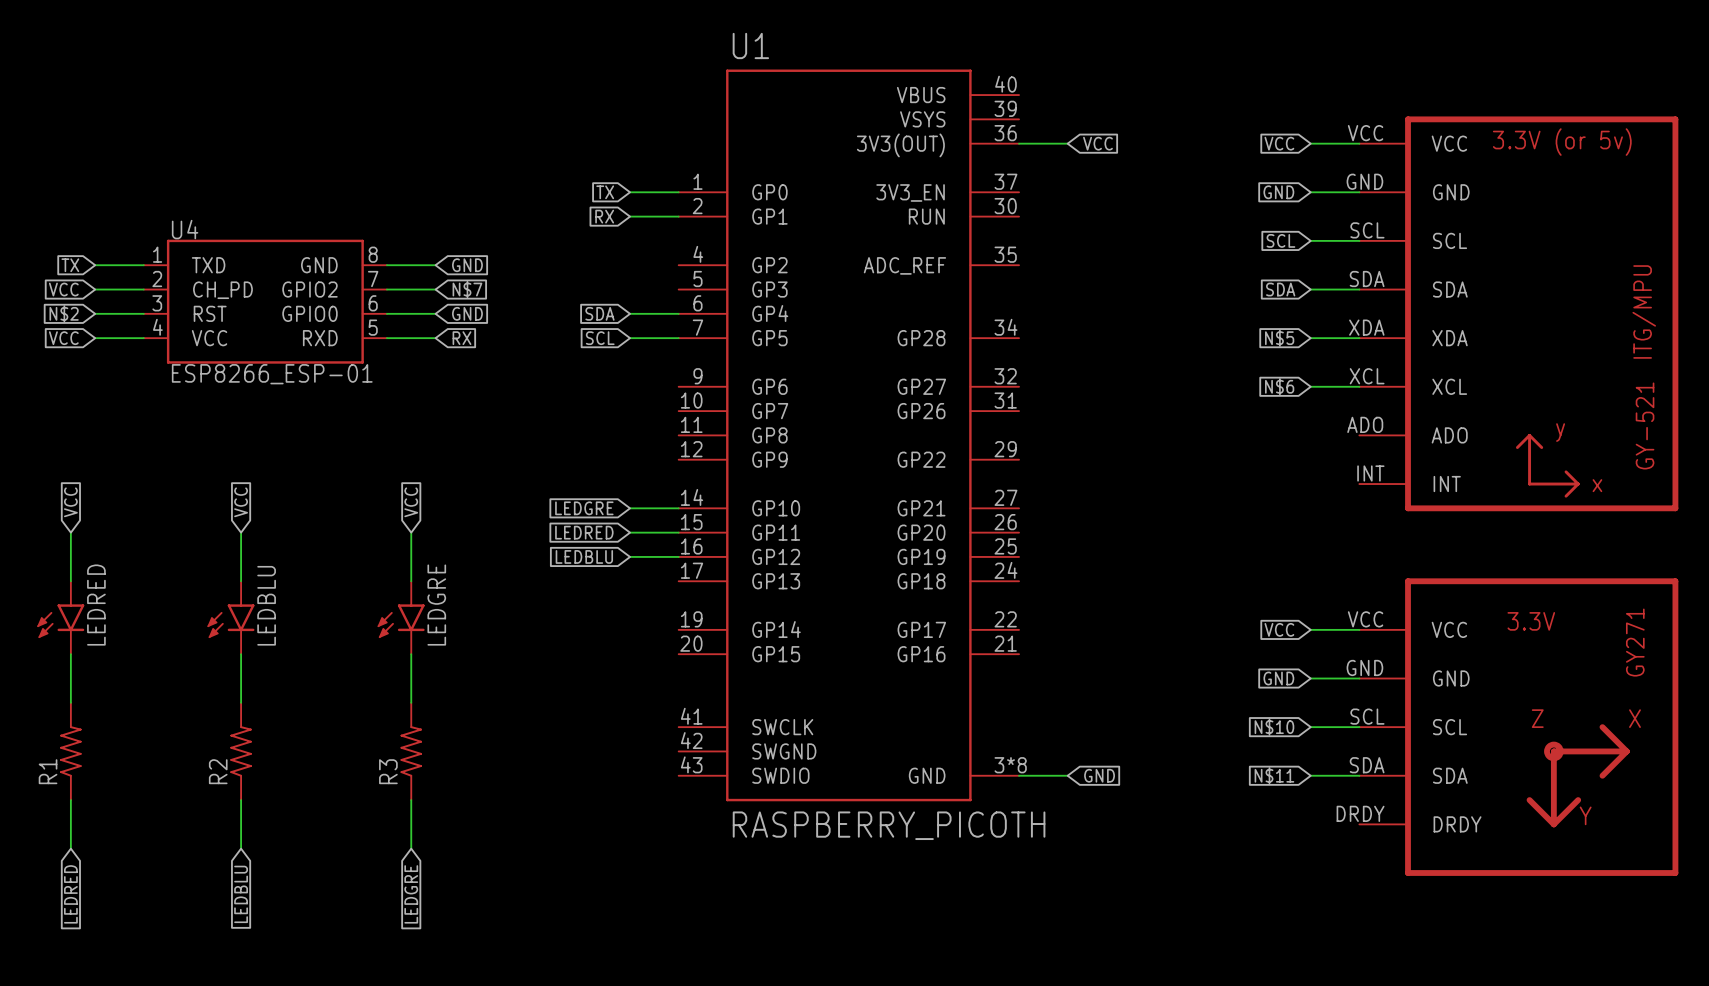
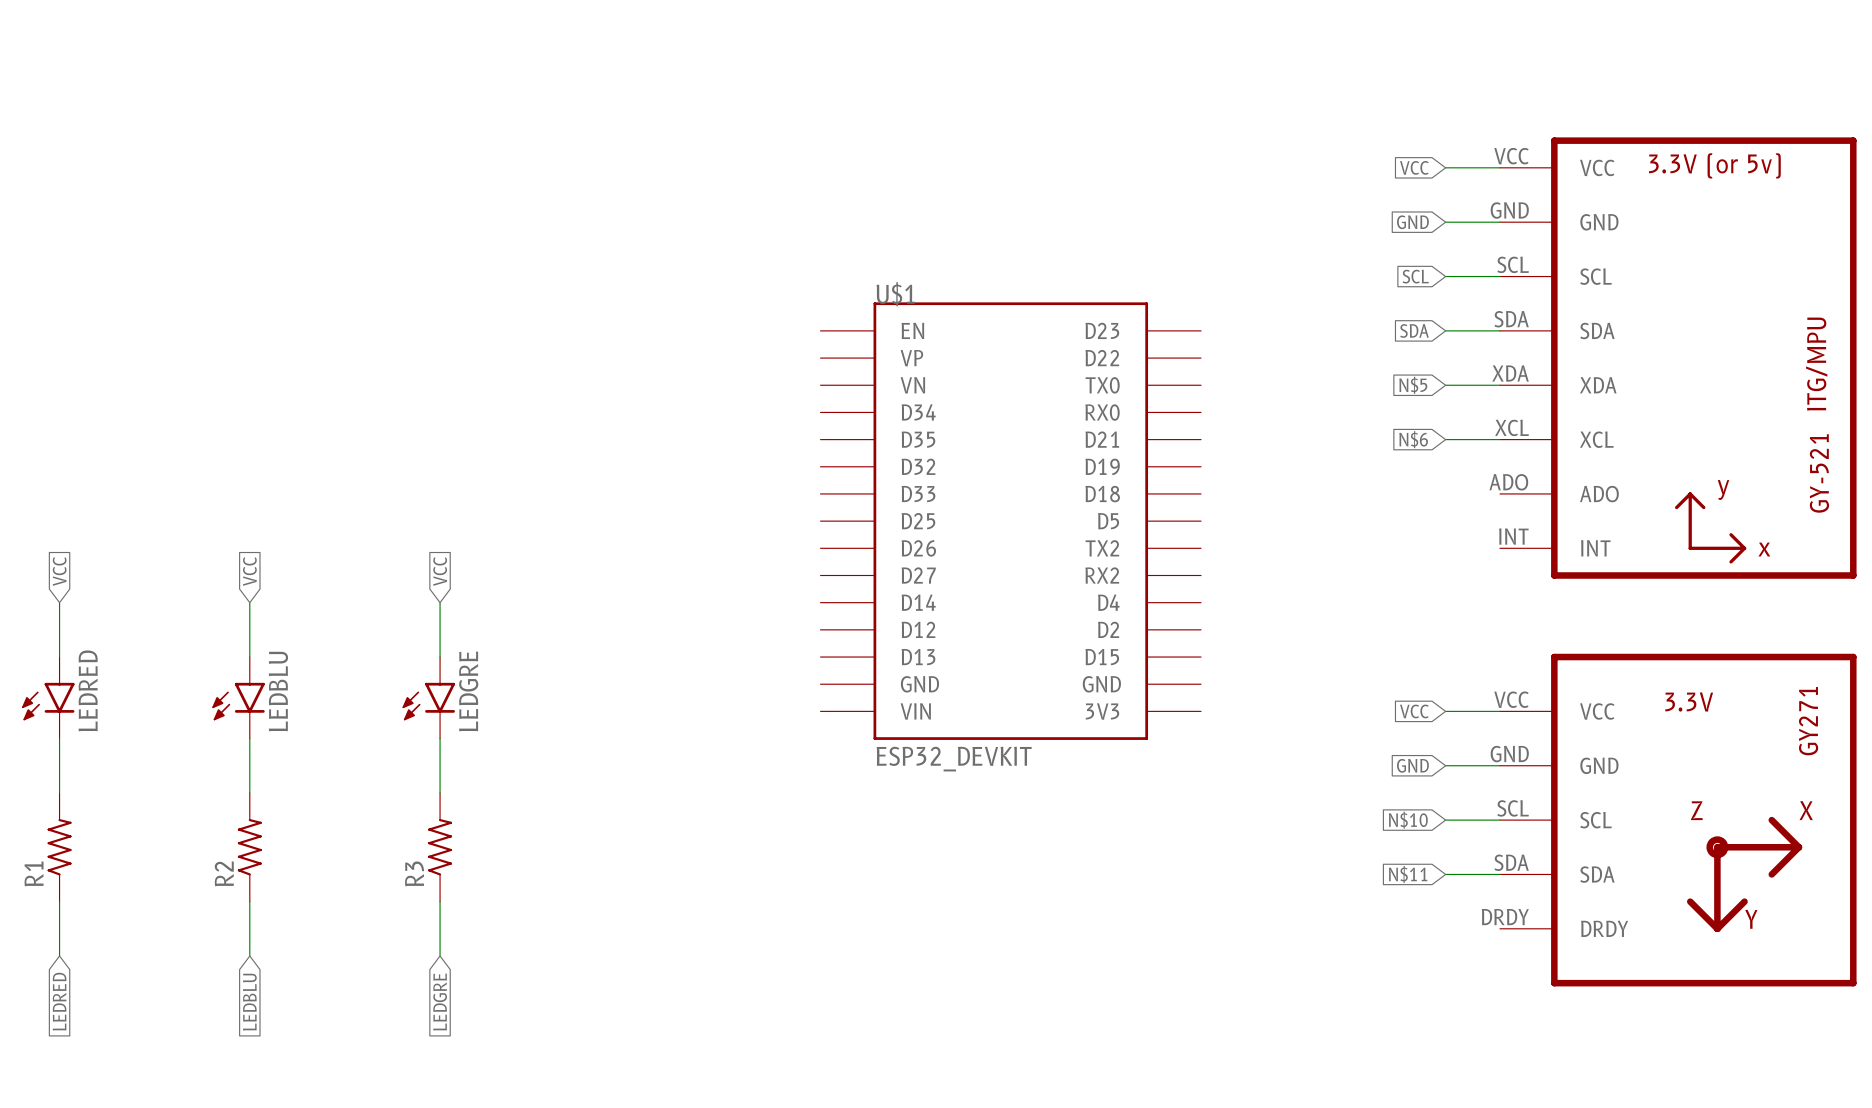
wire: (1019, 143) (1067, 143) -> none
global label: VCC (1097, 143) -> none
global label: TX (605, 192) -> none
wire: (630, 192) (678, 192) -> none
global label: RX (604, 216) -> none
wire: (630, 216) (678, 216) -> none
global label: TX (70, 265) -> none
wire: (95, 265) (143, 265) -> none
wire: (386, 265) (435, 265) -> none
global label: GND (467, 265) -> none
global label: VCC (63, 289) -> none
wire: (95, 289) (143, 289) -> none
wire: (386, 289) (435, 289) -> none
global label: N$7 (467, 289) -> none
U4: ESP8266_ESP-01 (265, 301) -> none
global label: N$2 (64, 313) -> none
wire: (95, 313) (143, 313) -> none
wire: (386, 313) (435, 313) -> none
global label: GND (467, 313) -> none
global label: SDA (599, 313) -> none
wire: (630, 313) (678, 313) -> none
global label: VCC (63, 338) -> none
wire: (95, 338) (143, 338) -> none
wire: (386, 338) (435, 338) -> none
global label: RX (461, 338) -> none
global label: SCL (600, 338) -> none
wire: (630, 338) (678, 338) -> none
U1: RASPBERRY_PICOTH (848, 435) -> none
U$1: none -> ESP32_DEVKIT (1010, 521)
global label: LEDGRE (584, 508) -> none
wire: (630, 508) (678, 508) -> none
global label: LEDRED (584, 532) -> none
wire: (630, 532) (678, 532) -> none
global label: LEDBLU (584, 556) -> none
wire: (630, 556) (678, 556) -> none
wire: (1019, 775) (1067, 775) -> none
global label: GND (1099, 775) -> none

